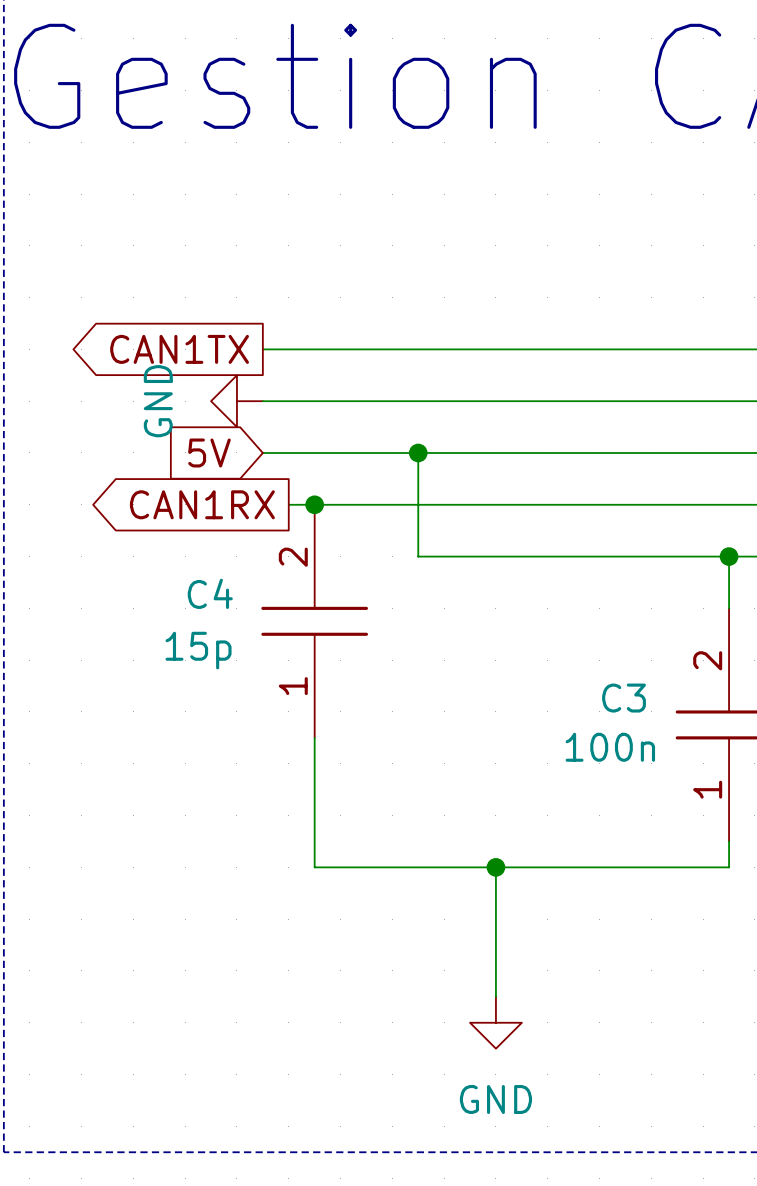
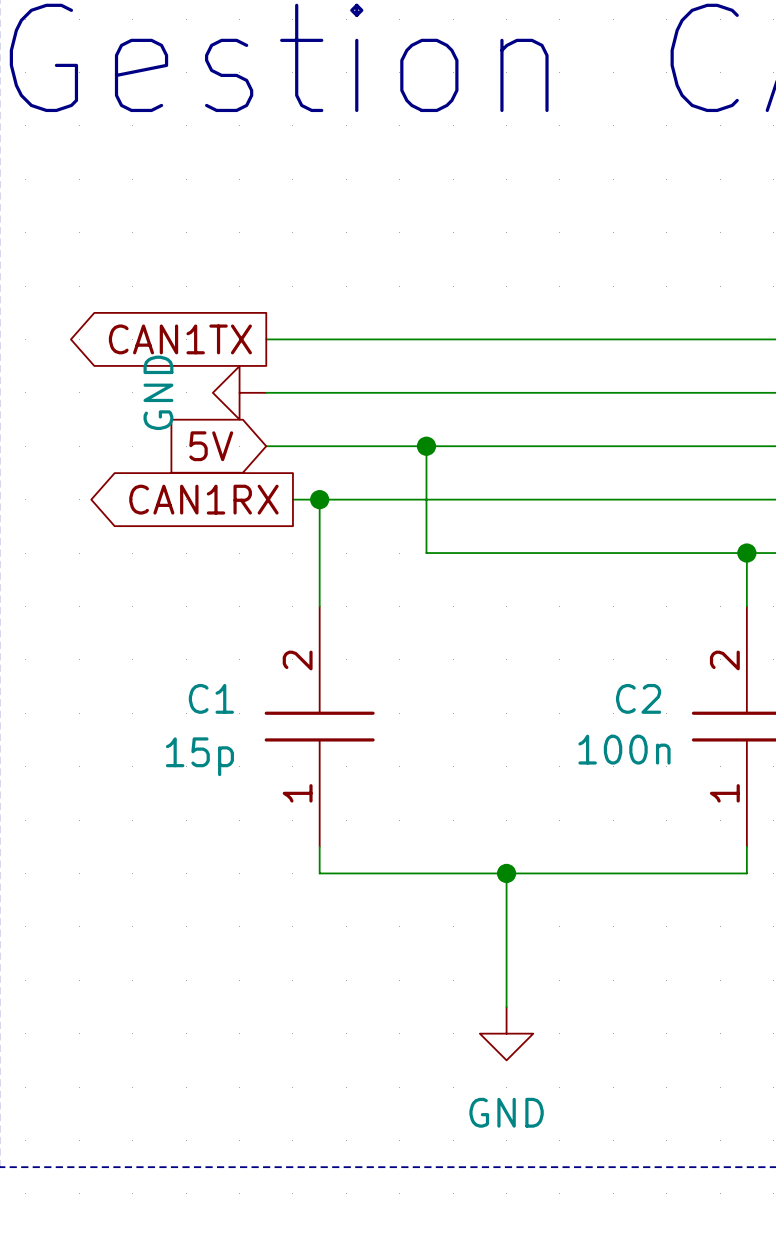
C4: 15p (314, 621) -> none
C3 name: C3 (624, 698) -> C2 (638, 698)
C1: none -> 15p (319, 726)

